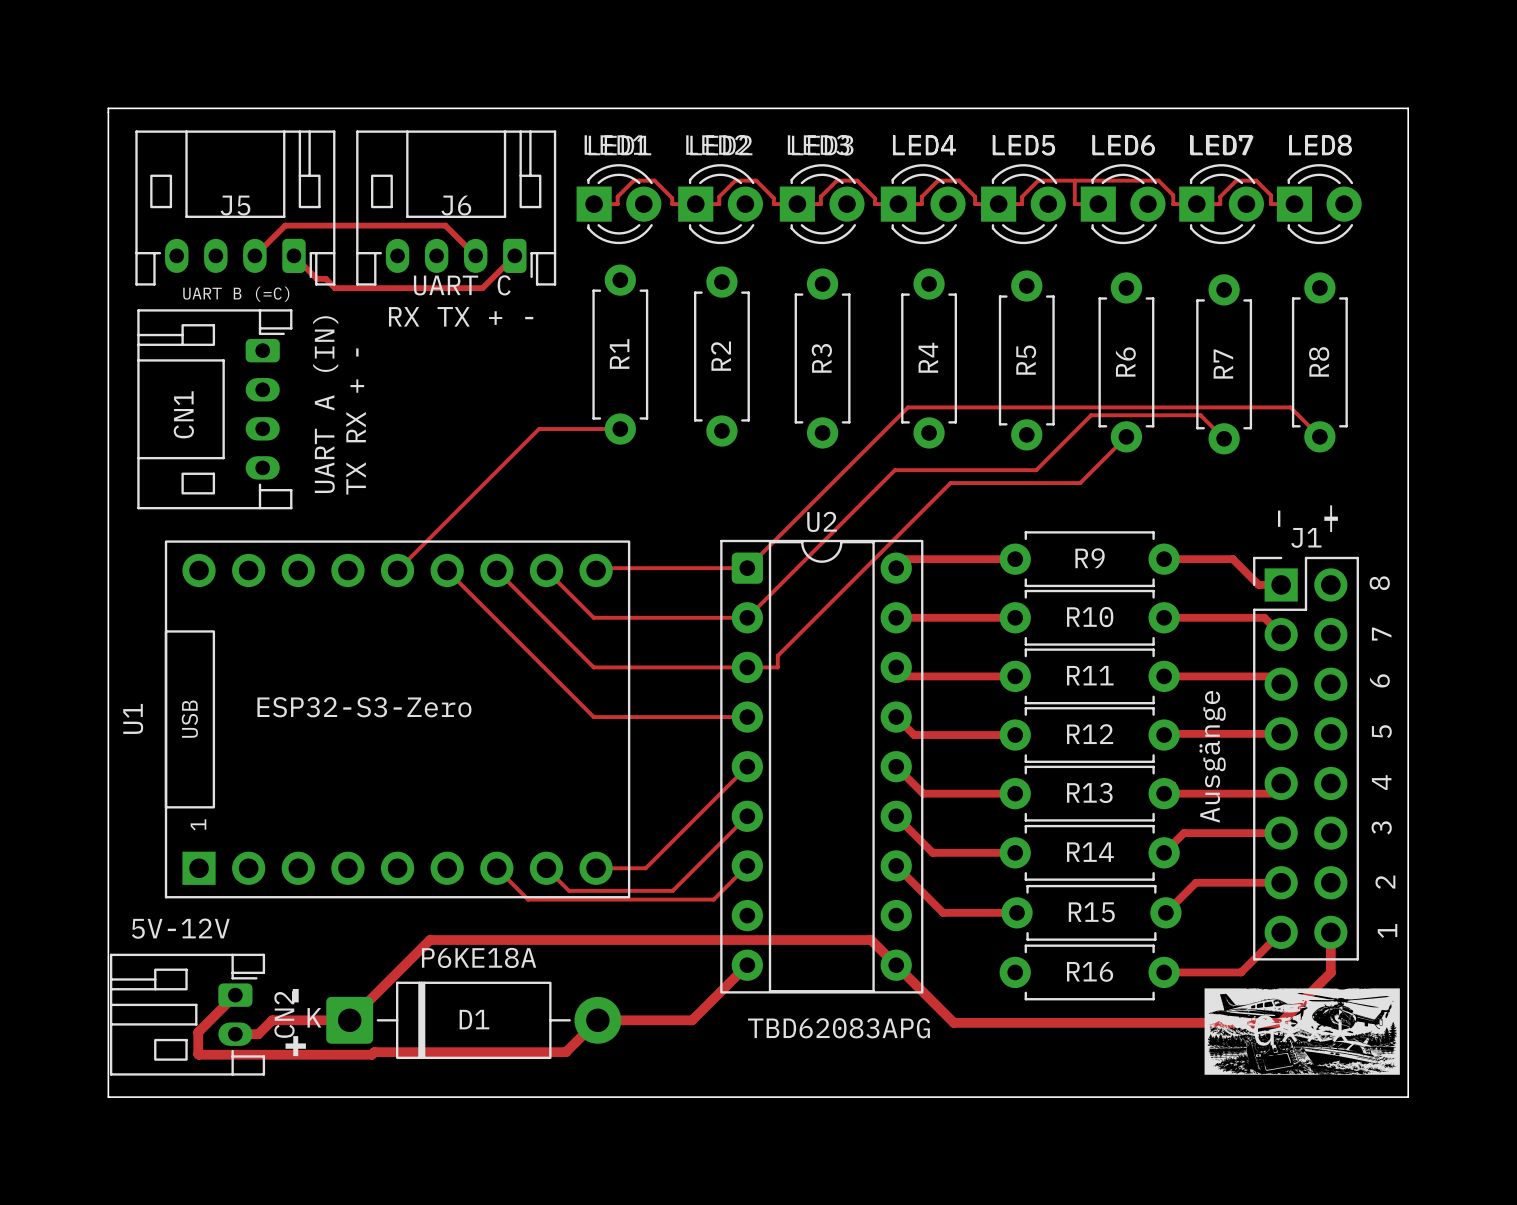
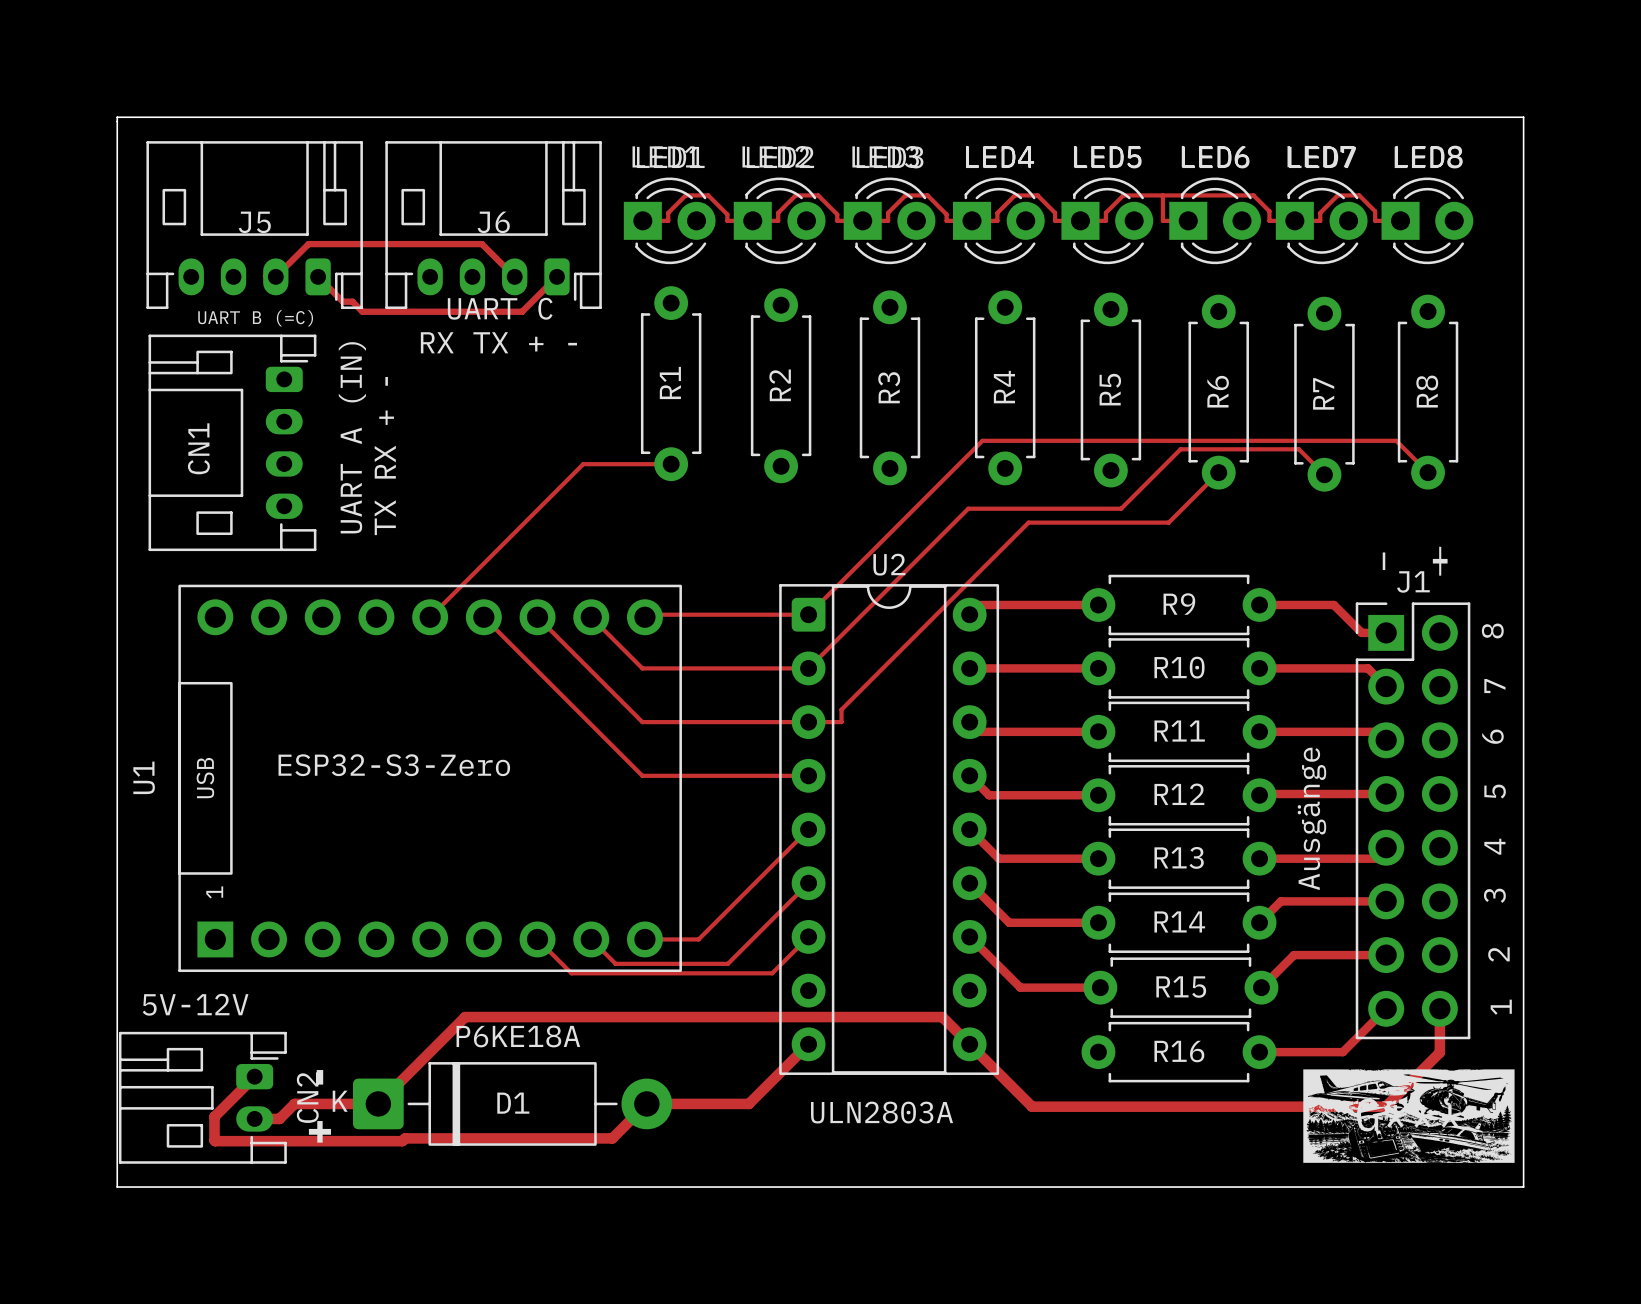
text: TBD62083APG (838, 1028) -> ULN2803A (882, 1112)

